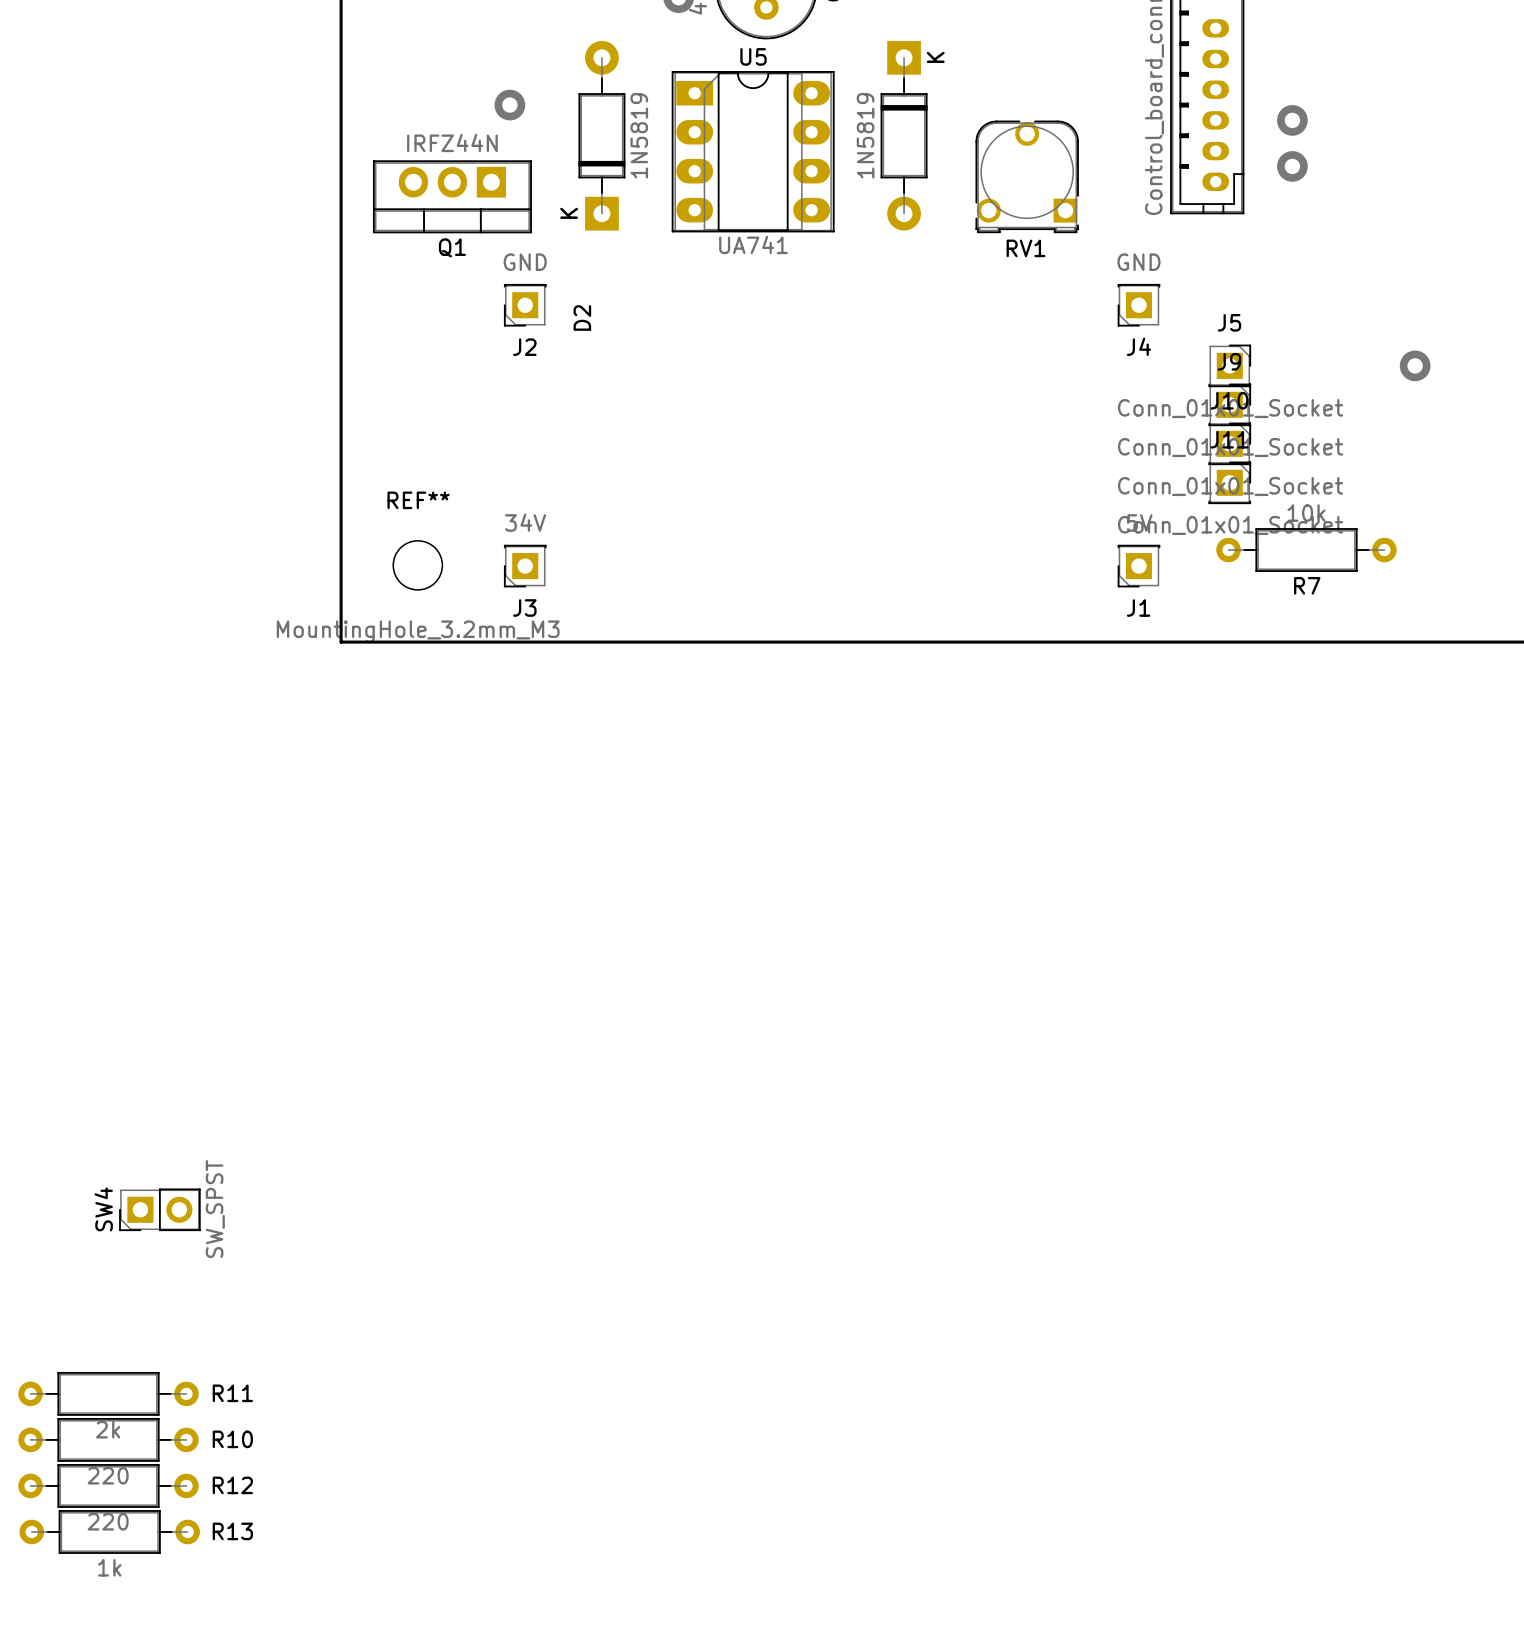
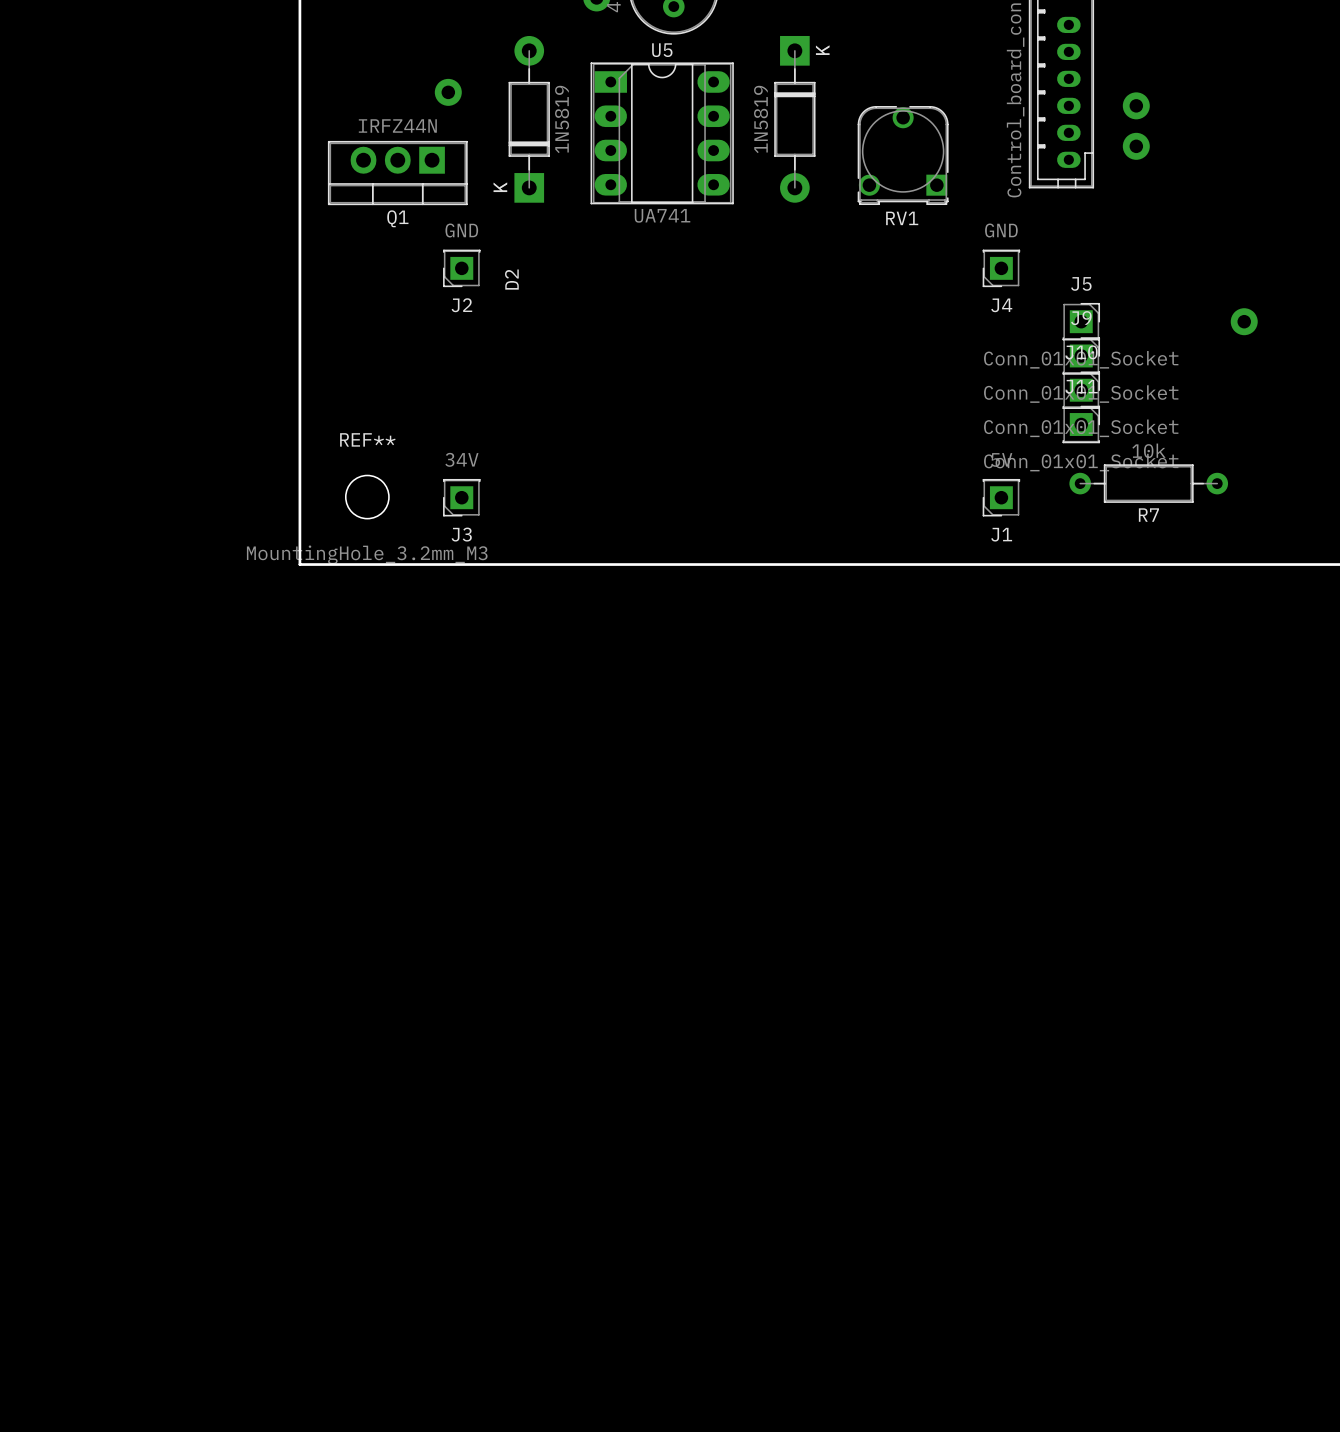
SW4: SW_SPST (159, 1209) -> none
R11: 2k (108, 1393) -> none
R10: 220 (108, 1439) -> none
R12: 220 (108, 1485) -> none
R13: 1k (109, 1531) -> none

